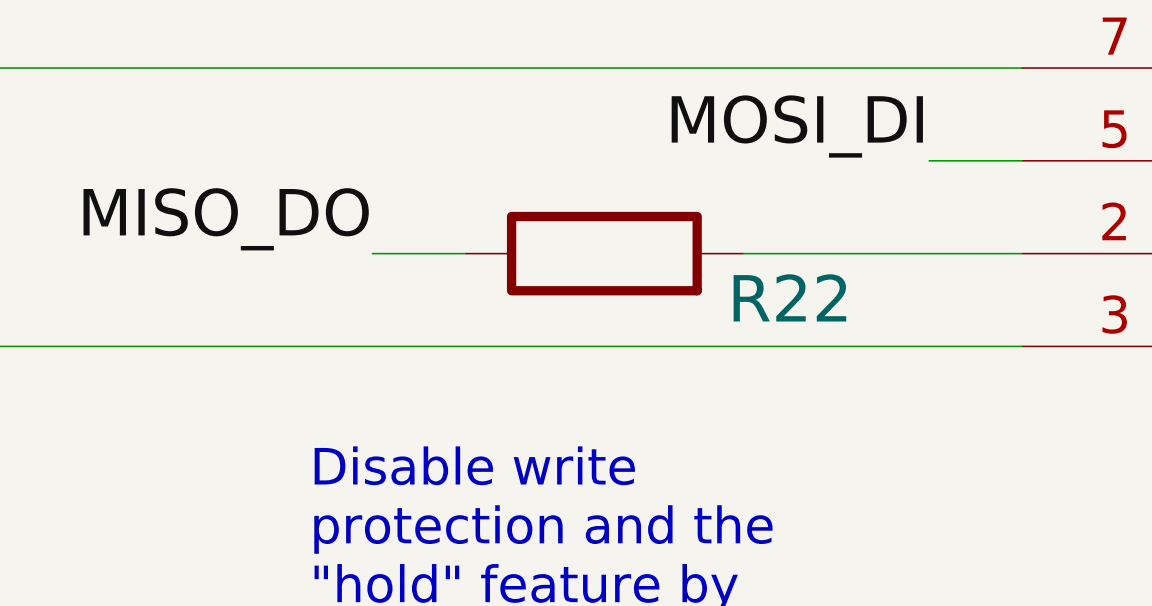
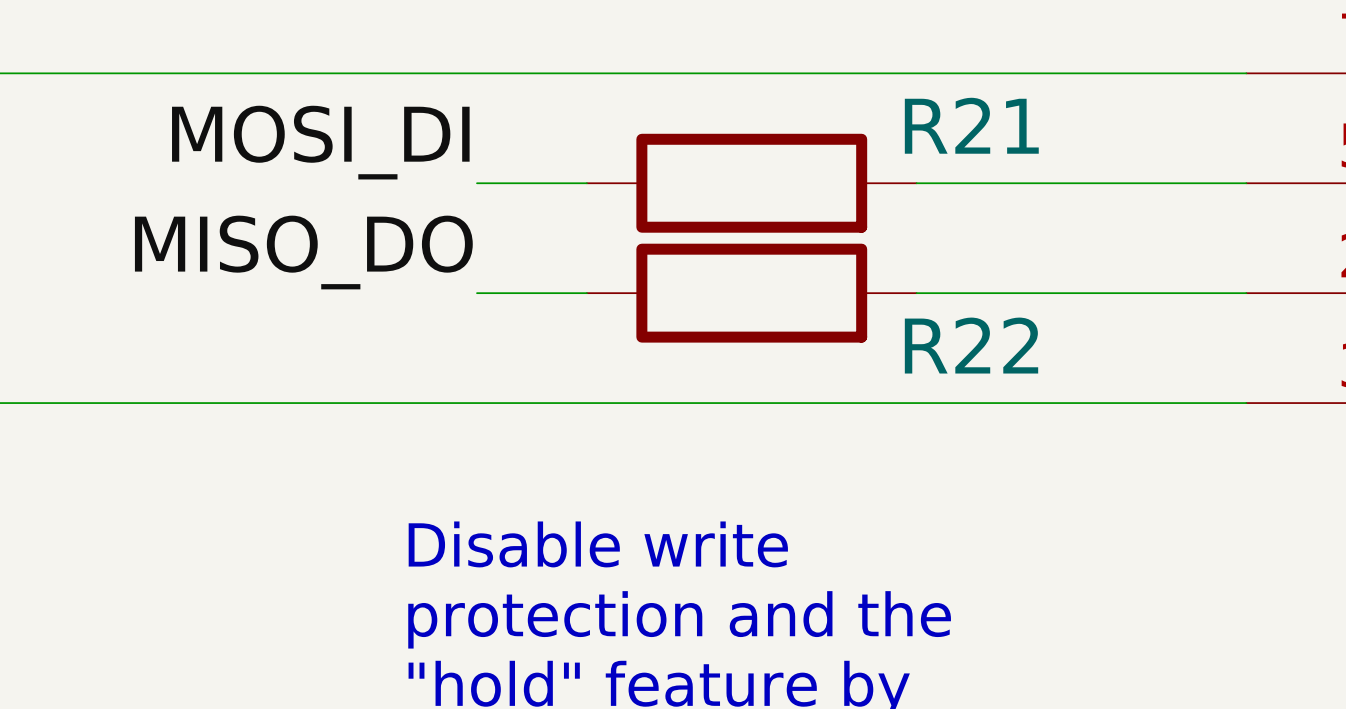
label position: MOSI_DI (797, 126) -> MOSI_DI (320, 142)
wire: none -> (477, 183) (586, 183)
R21: none -> (751, 183)
wire: none -> (916, 183) (1136, 183)

